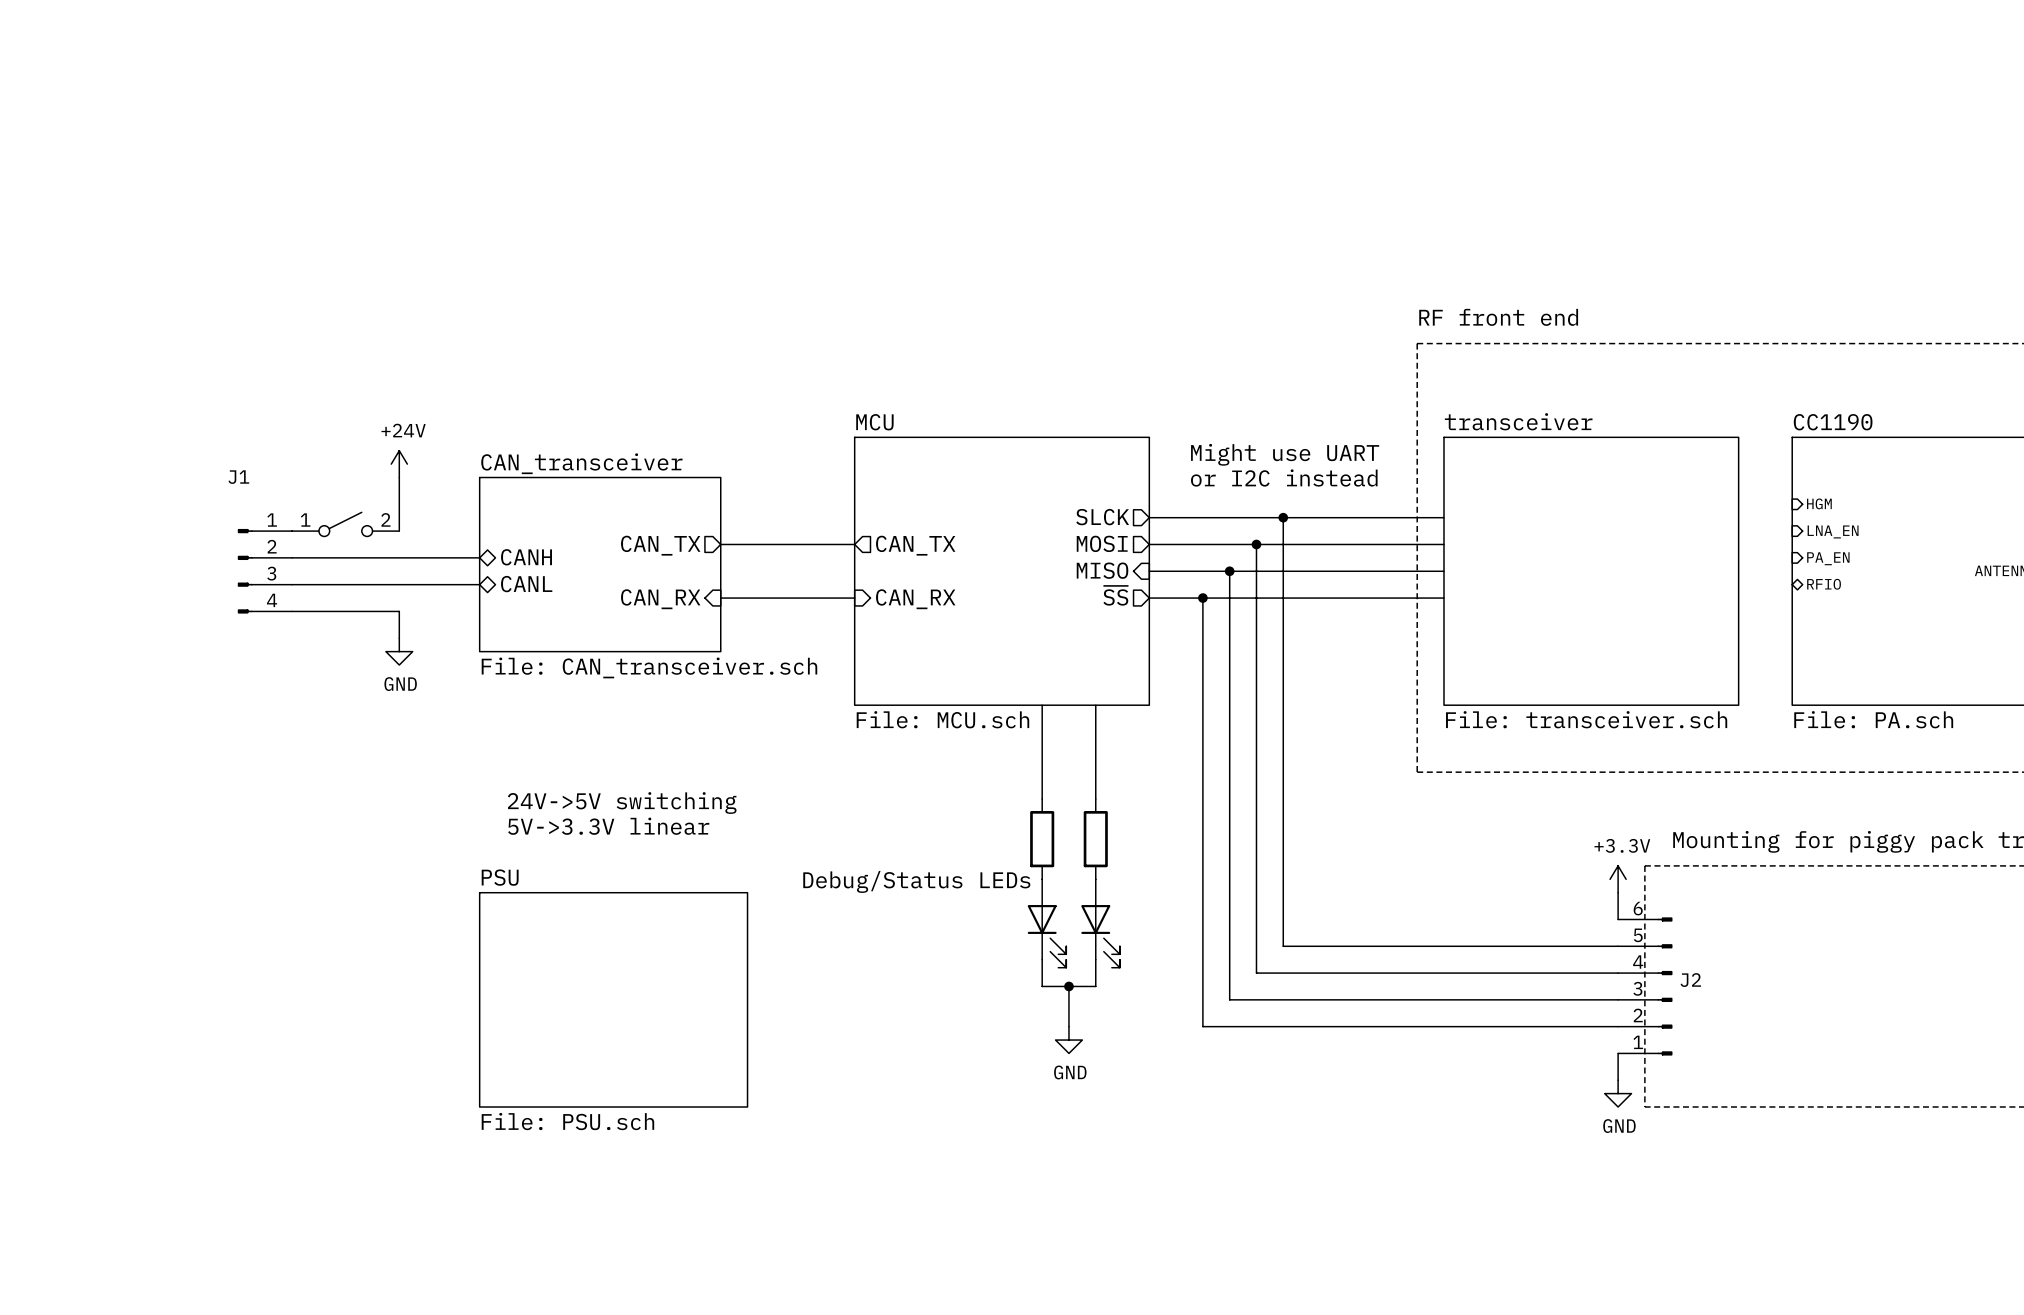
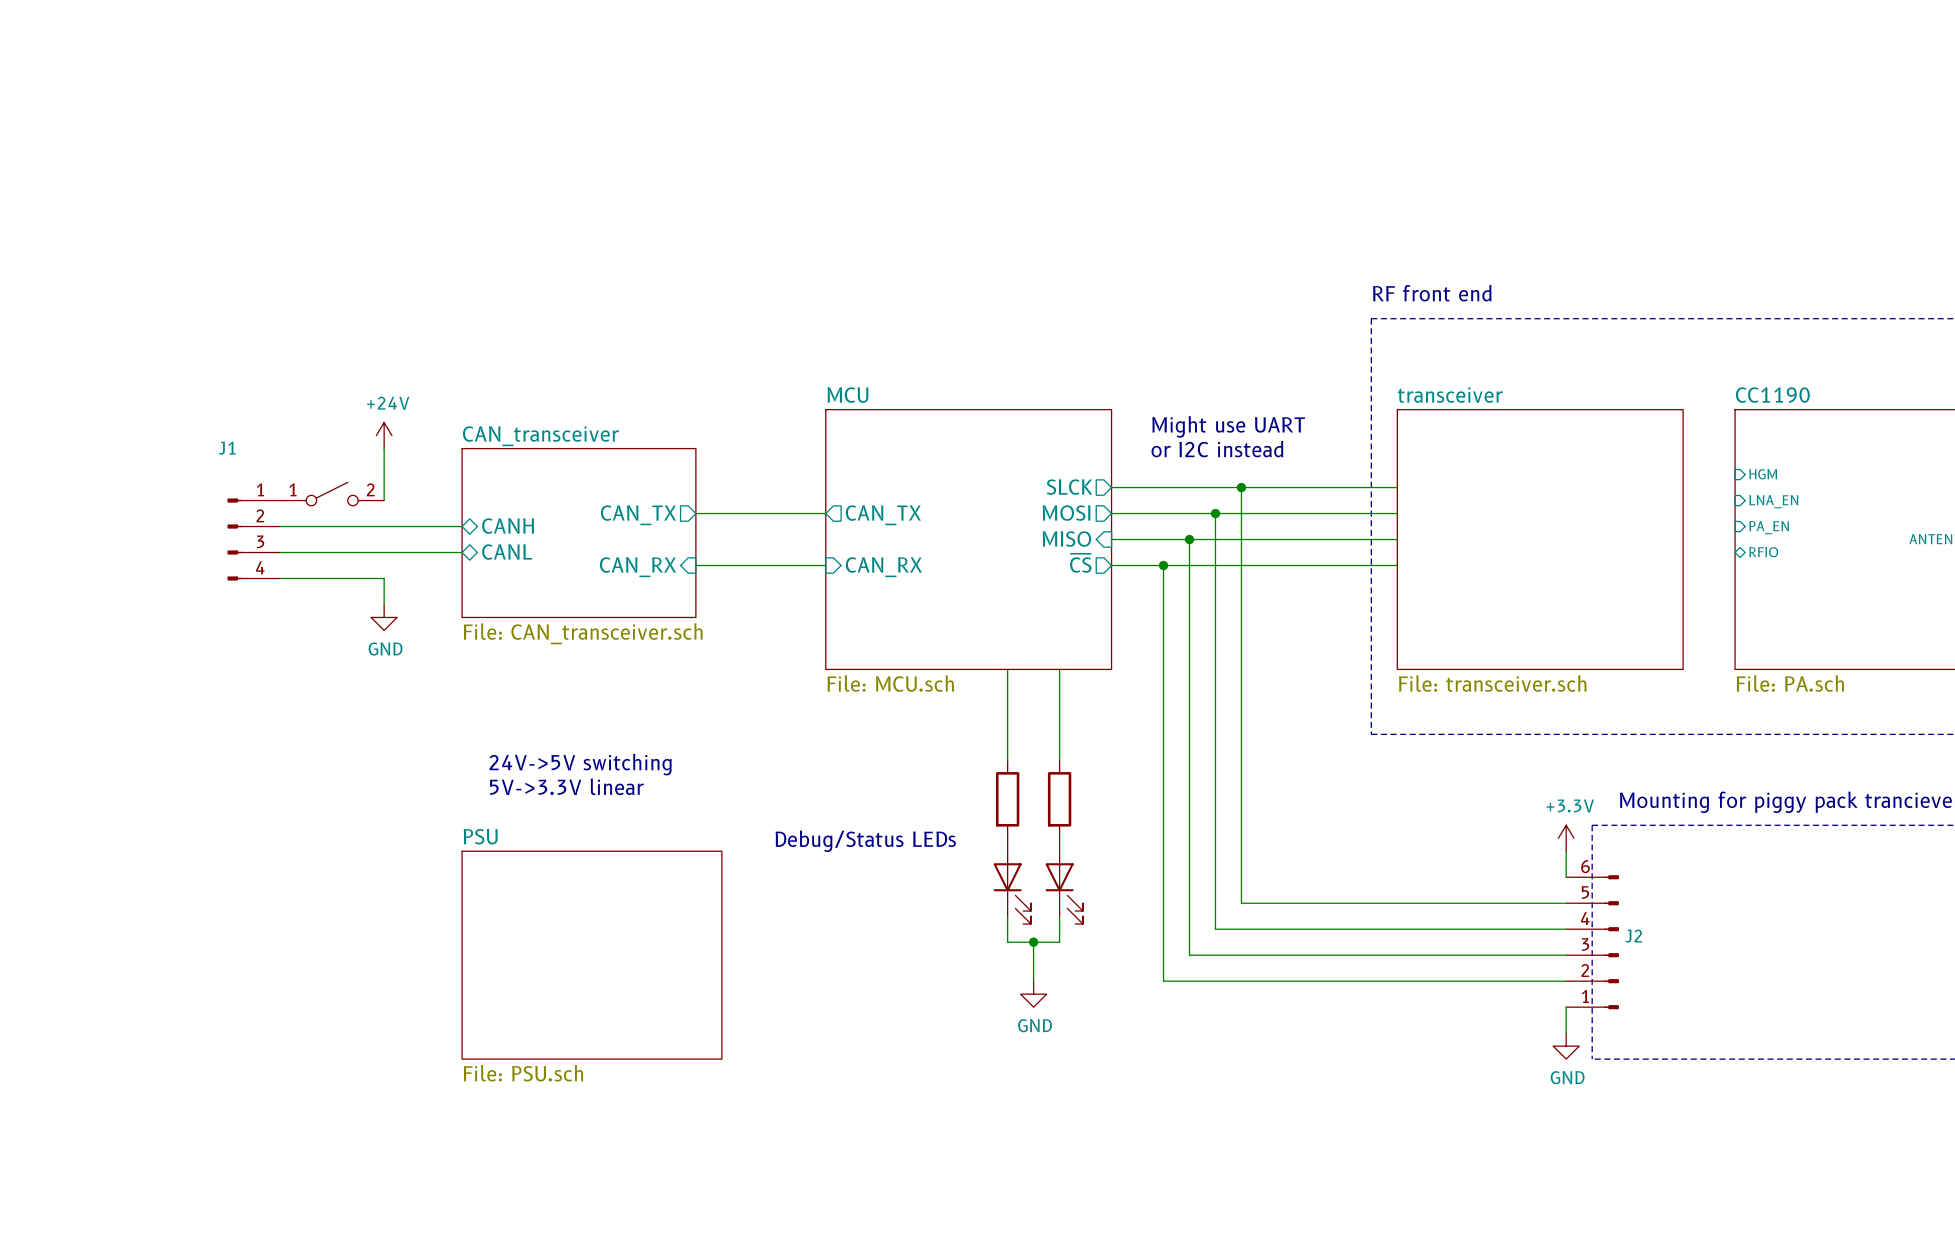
sheet pin: ~{SS} (1115, 595) -> ~{CS} (1080, 563)

